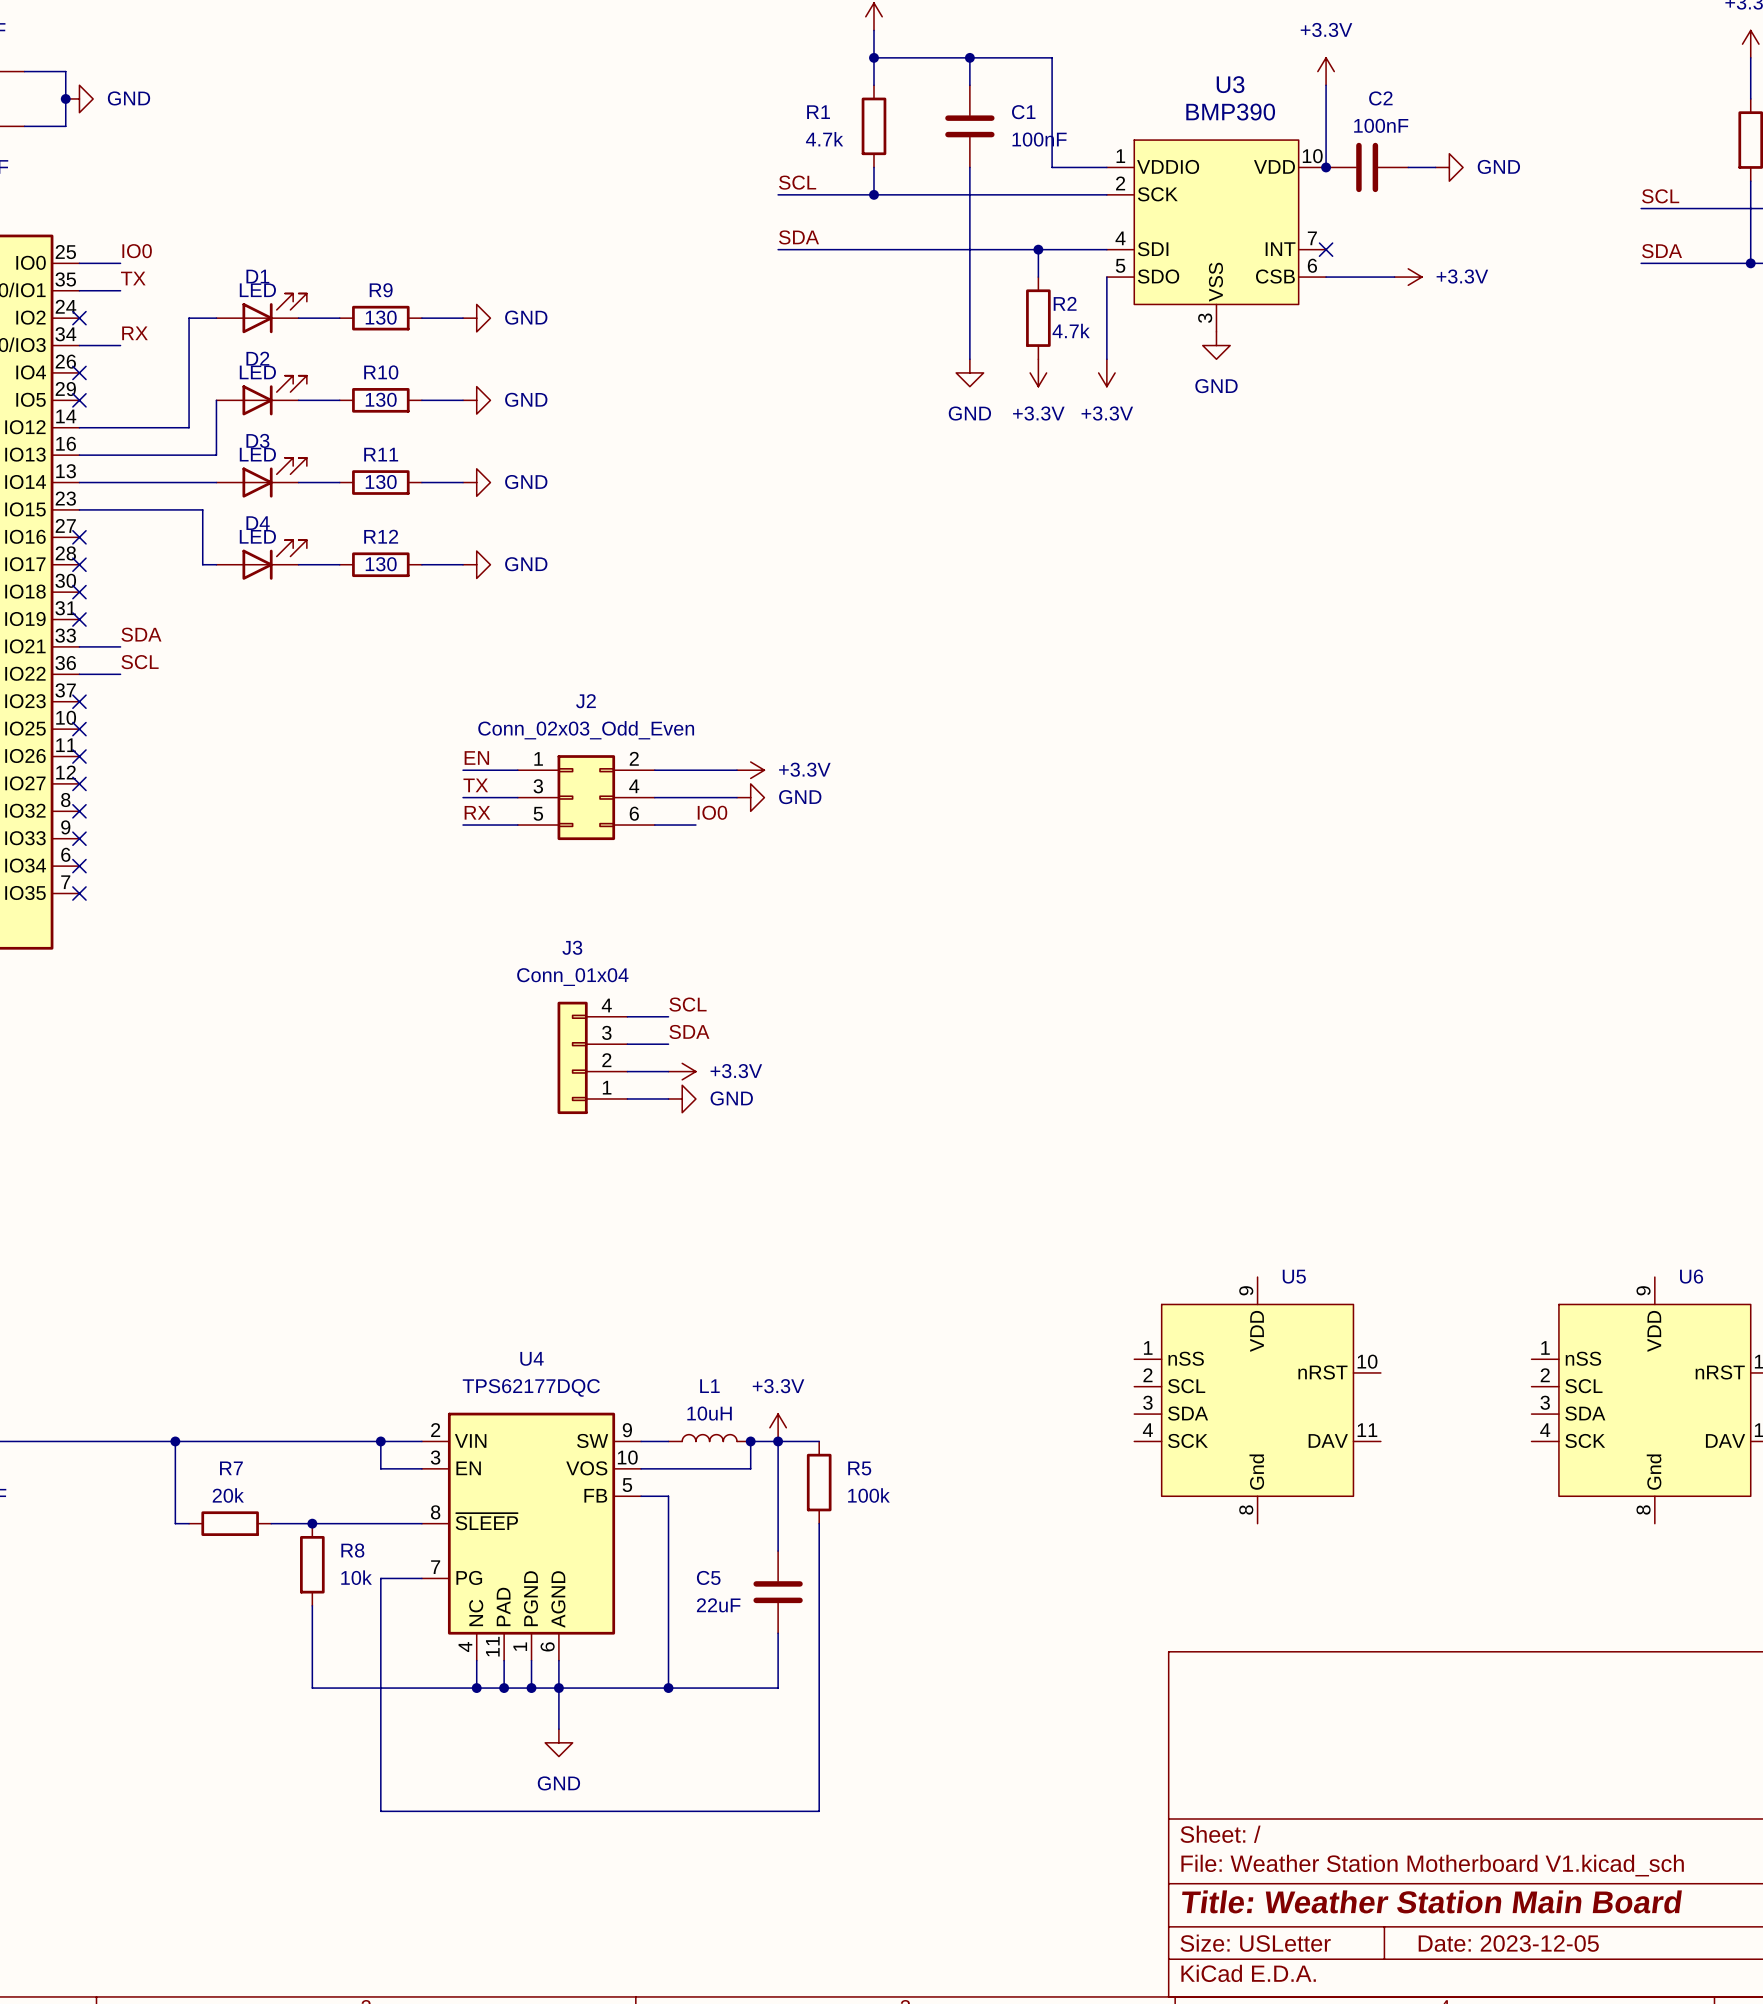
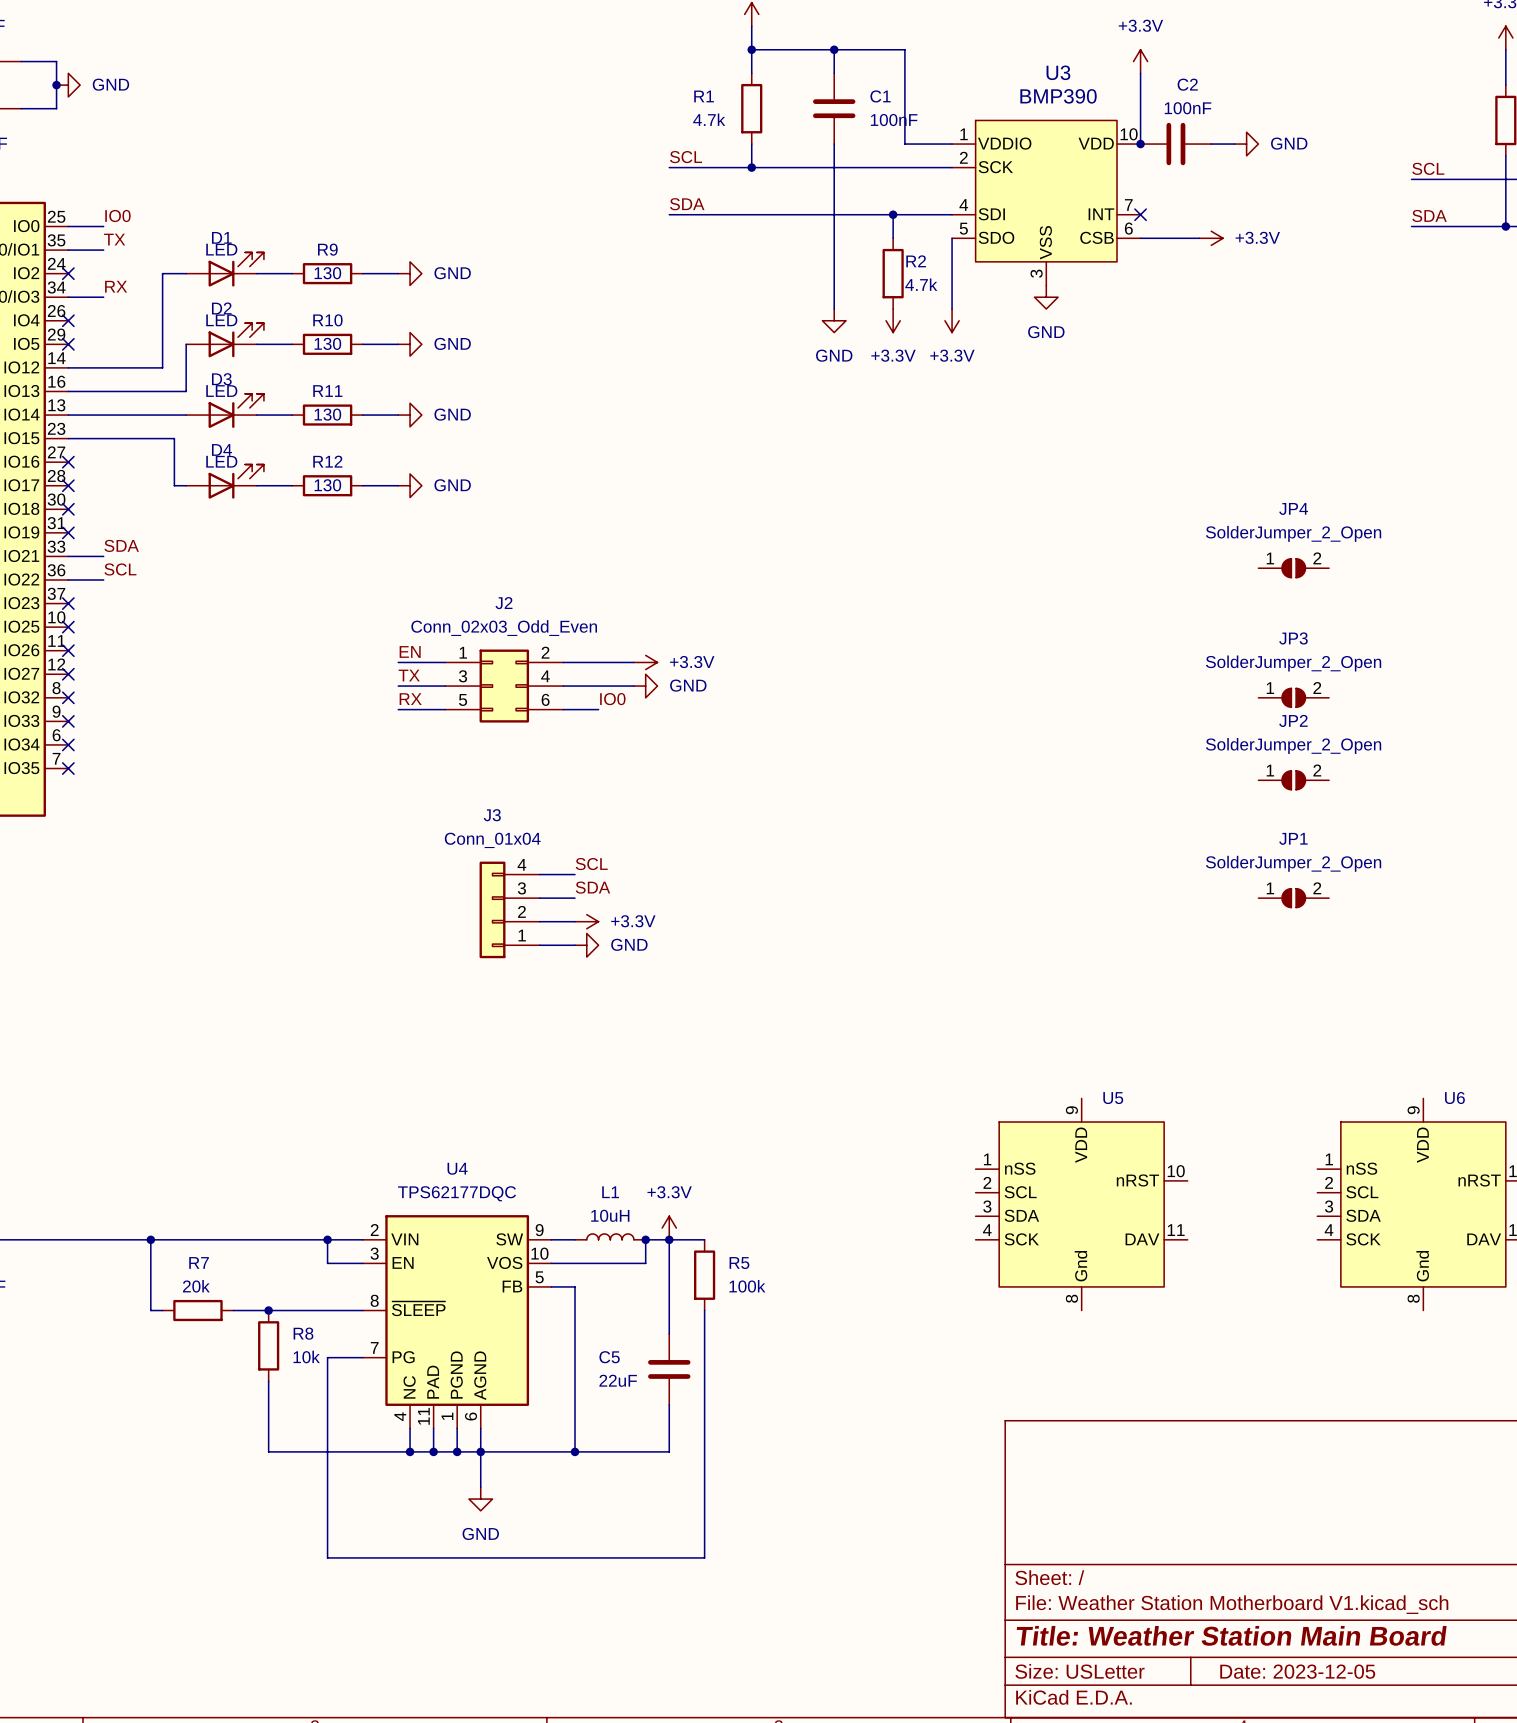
JP4: none -> SolderJumper_2_Open (1293, 568)
JP3: none -> SolderJumper_2_Open (1293, 697)
JP2: none -> SolderJumper_2_Open (1293, 780)
JP1: none -> SolderJumper_2_Open (1293, 898)

